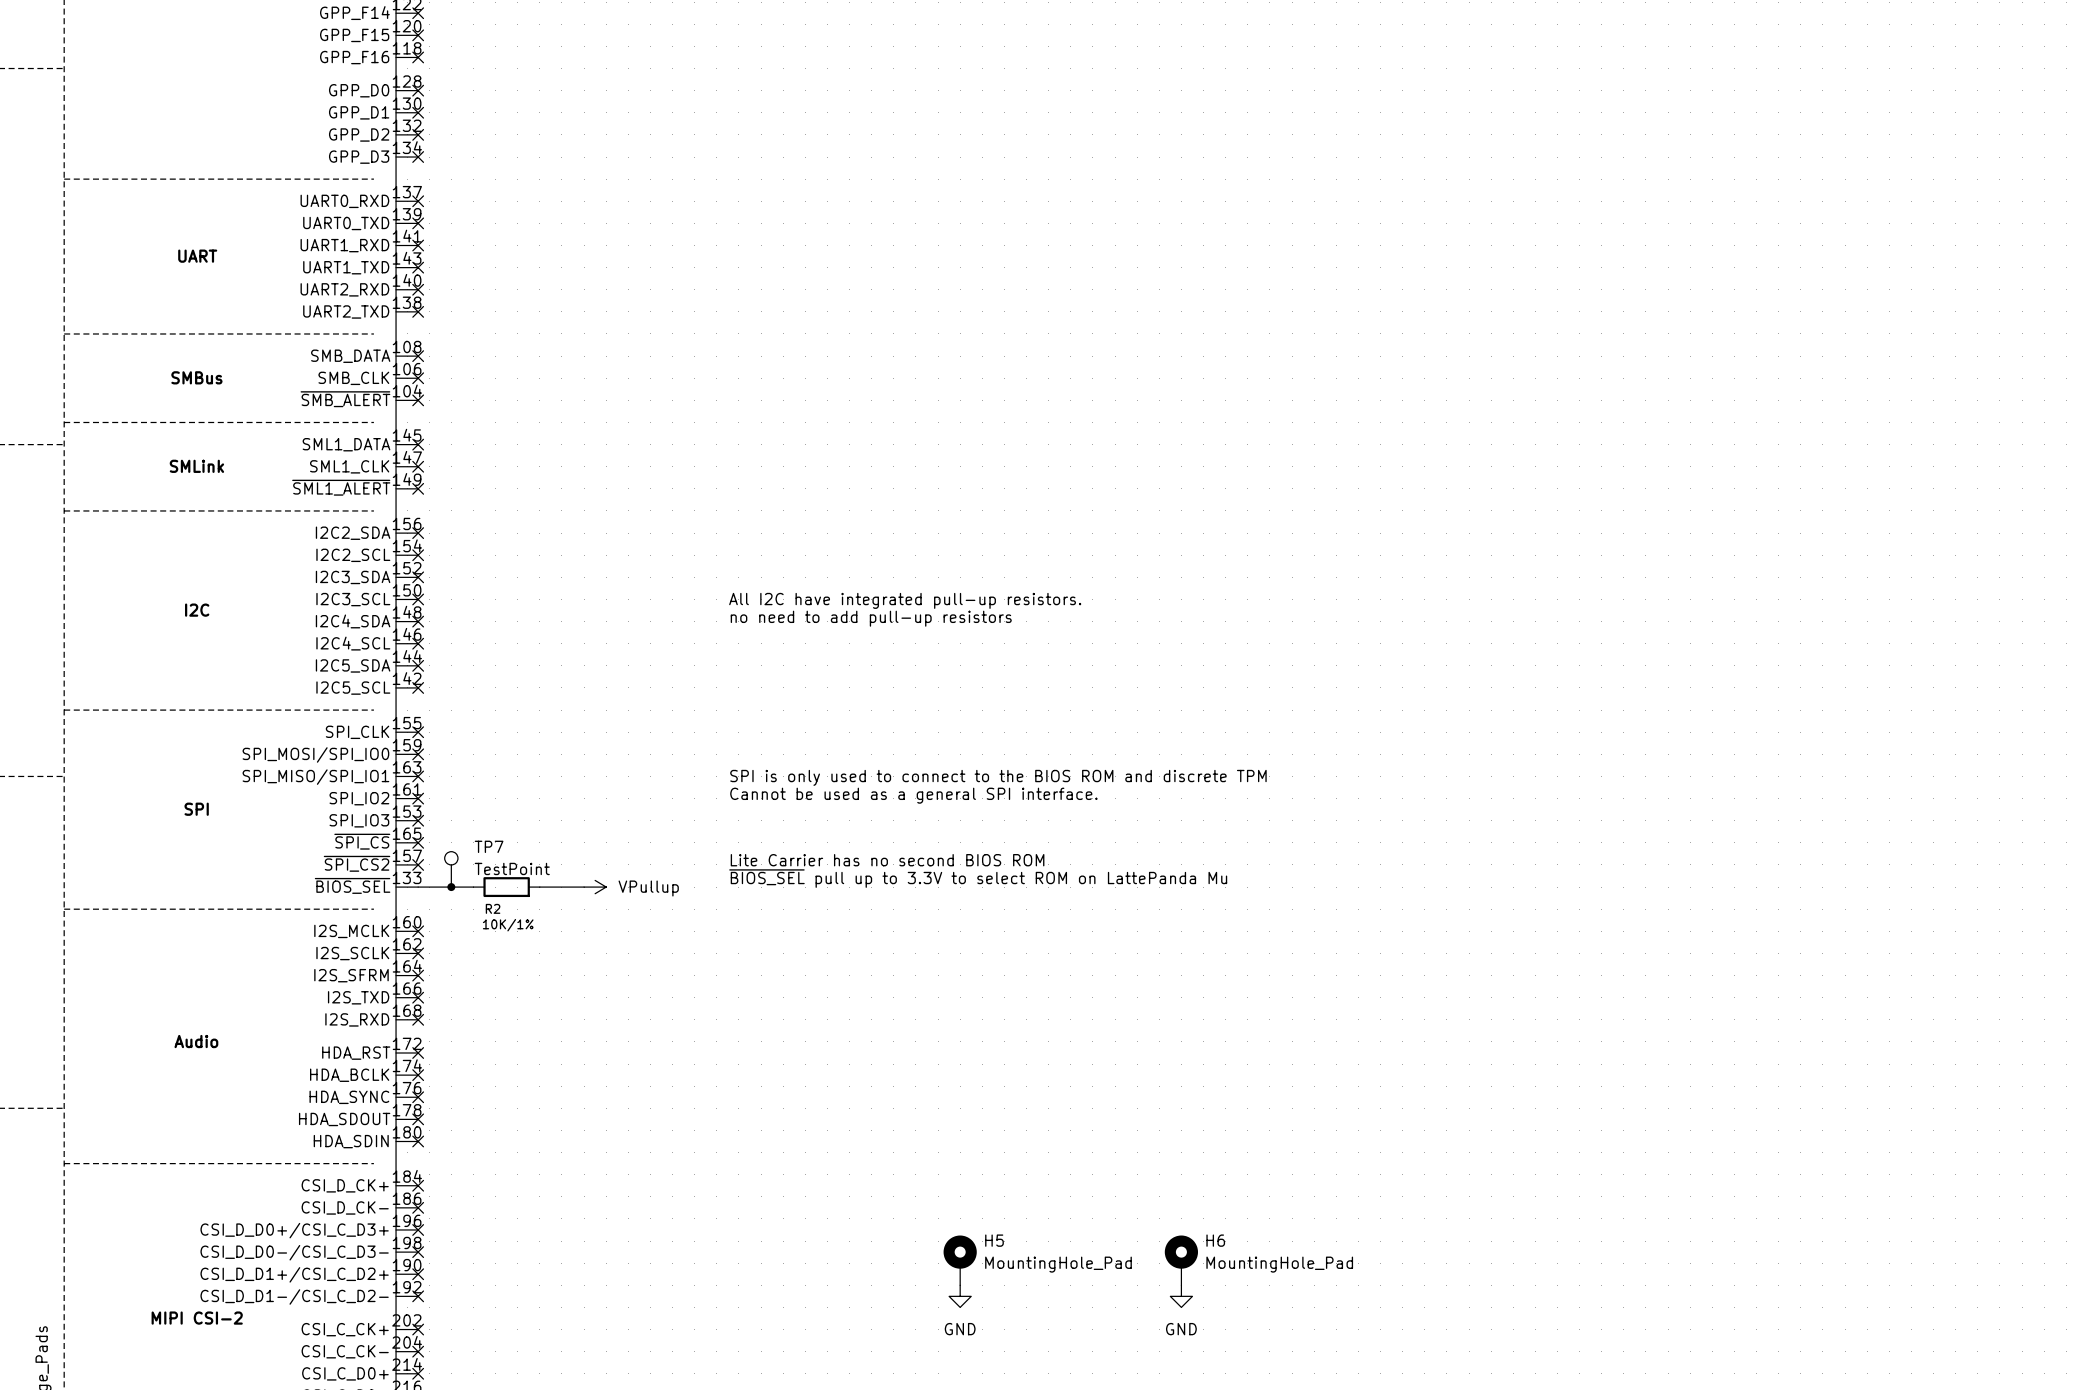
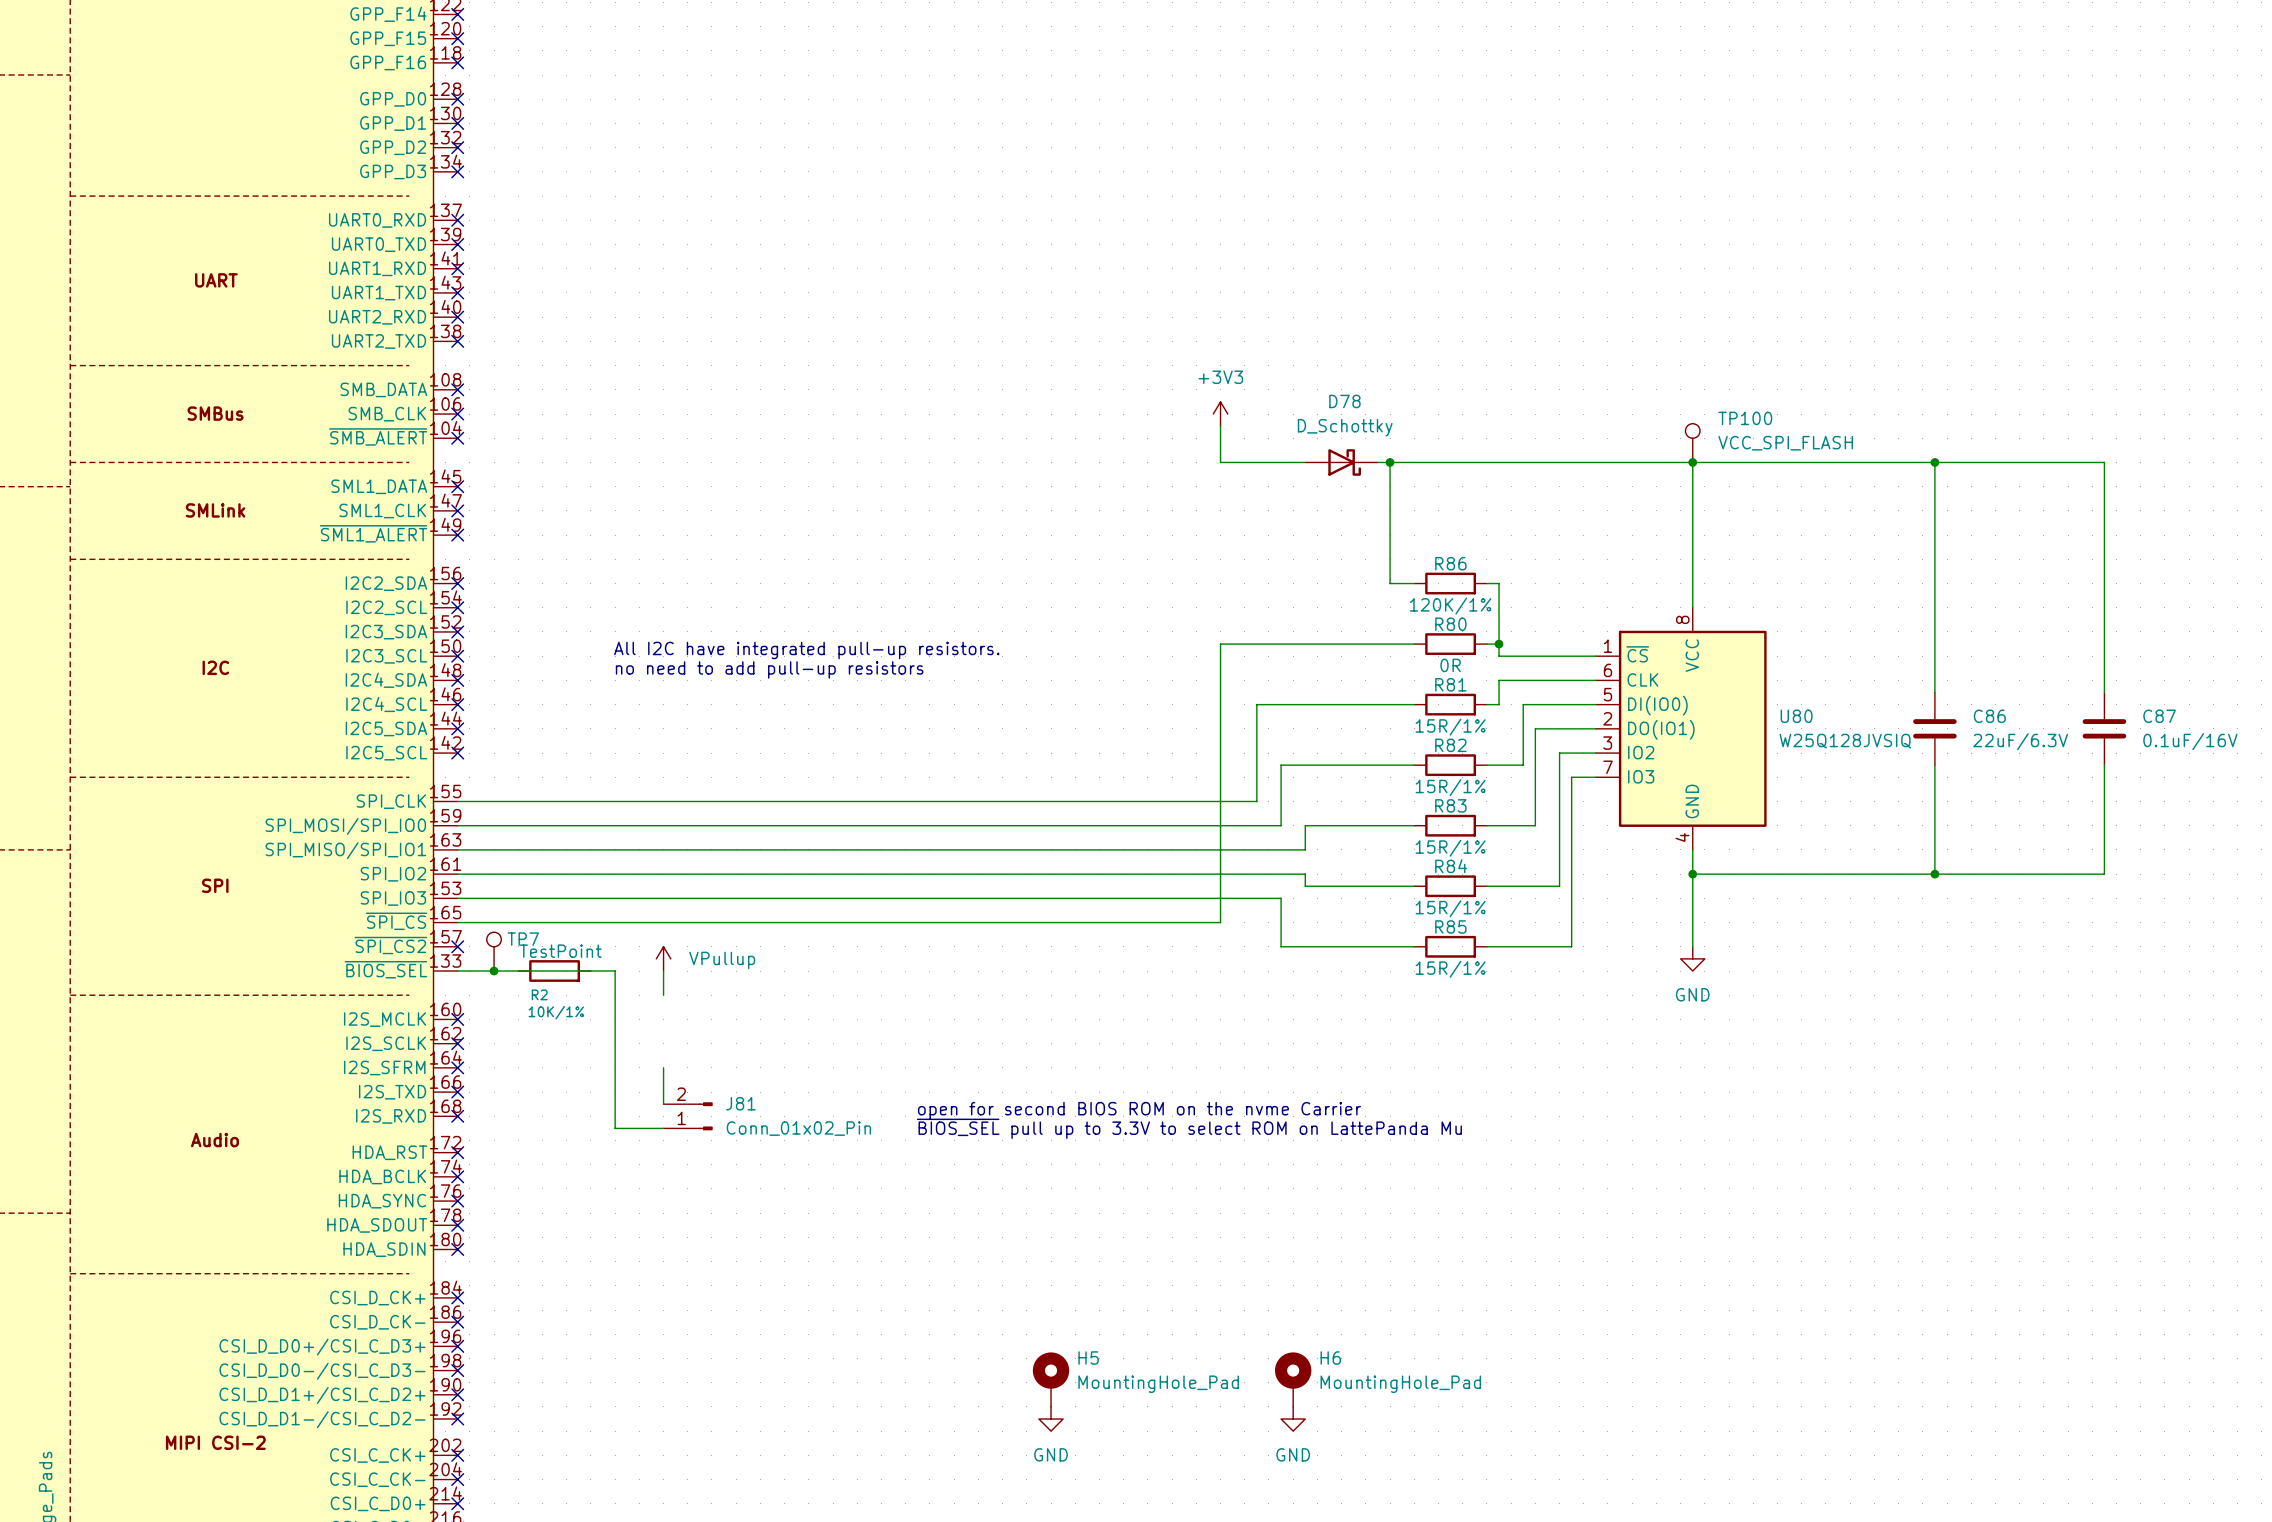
power symbol: none -> +3V3 (1220, 414)
wire: none -> (1220, 426) (1220, 462) (1305, 462)
TP100: none -> VCC_SPI_FLASH (1692, 443)
D78: none -> D_Schottky (1341, 462)
wire: none -> (1377, 462) (2104, 462) (2104, 692)
wire: none -> (1390, 462) (1390, 583) (1414, 583)
junction: none -> (1390, 462)
wire: none -> (1692, 462) (1692, 607)
junction: none -> (1692, 462)
wire: none -> (1934, 462) (1934, 692)
junction: none -> (1934, 462)
R86: none -> 120K/1% (1450, 583)
wire: none -> (1486, 583) (1499, 583) (1499, 656) (1595, 656)
wire: none -> (1414, 644) (1220, 644) (1220, 922) (457, 922)
R80: none -> 0R (1450, 644)
wire: none -> (1486, 644) (1499, 644)
junction: none -> (1499, 644)
text position: All I2C have integrated pull-up resistors. (905, 600) -> All I2C have integrated pull-up resistors. (806, 650)
text position: no need to add pull-up resistors (871, 618) -> no need to add pull-up resistors (769, 669)
wire: none -> (1595, 680) (1499, 680) (1499, 704) (1486, 704)
wire: none -> (1414, 704) (1256, 704) (1256, 801) (457, 801)
R81: none -> 15R/1% (1450, 704)
wire: none -> (1595, 704) (1523, 704) (1523, 765) (1486, 765)
wire: none -> (1595, 728) (1535, 728) (1535, 825) (1486, 825)
U80: none -> W25Q128JVSIQ (1681, 728)
C86: none -> 22uF/6.3V (1934, 728)
C87: none -> 0.1uF/16V (2104, 728)
wire: none -> (1595, 753) (1559, 753) (1559, 886) (1486, 886)
wire: none -> (1414, 765) (1281, 765) (1281, 825) (457, 825)
R82: none -> 15R/1% (1450, 765)
wire: none -> (1934, 765) (1934, 874)
wire: none -> (2104, 765) (2104, 874) (1692, 874)
wire: none -> (1595, 777) (1571, 777) (1571, 946) (1486, 946)
no-connect mark: (418, 732) -> none
no-connect mark: (418, 754) -> none
wire: none -> (1414, 825) (1305, 825) (1305, 849) (457, 849)
R83: none -> 15R/1% (1450, 825)
no-connect mark: (418, 776) -> none
wire: none -> (1692, 849) (1692, 946)
text: SPI is only used to connect to the BIOS ROM and discrete TPM (998, 777) -> none
text: Cannot be used as a general SPI interface. (913, 795) -> none
wire: none -> (457, 874) (1305, 874) (1305, 886) (1414, 886)
no-connect mark: (418, 798) -> none
junction: none -> (1692, 874)
junction: none -> (1934, 874)
R84: none -> 15R/1% (1450, 886)
wire: none -> (457, 898) (1281, 898) (1281, 946) (1414, 946)
no-connect mark: (418, 820) -> none
no-connect mark: (418, 842) -> none
TP7 name position: TP7 (489, 846) -> TP7 (523, 939)
text: Lite Carrier has no second BIOS ROM (887, 860) -> none
R85: none -> 15R/1% (1450, 946)
power symbol: none -> GND (1692, 958)
text position: ~{BIOS_SEL} pull up to 3.3V to select ROM on LattePanda Mu (978, 878) -> ~{BIOS_SEL} pull up to 3.3V to select ROM on LattePanda Mu (1189, 1128)
wire: none -> (518, 971) (590, 971)
wire: (561, 887) (584, 887) -> (615, 971) (615, 1128) (663, 1128)
power symbol rotation: 0° (595, 887) -> 90° counterclockwise (663, 958)
power symbol position: VPullup (595, 887) -> VPullup (663, 958)
wire: none -> (663, 971) (663, 995)
wire: none -> (663, 1067) (663, 1104)
text: none -> open for second BIOS ROM on the nvme Carrier (1139, 1110)
J81: none -> Conn_01x02_Pin (688, 1116)

